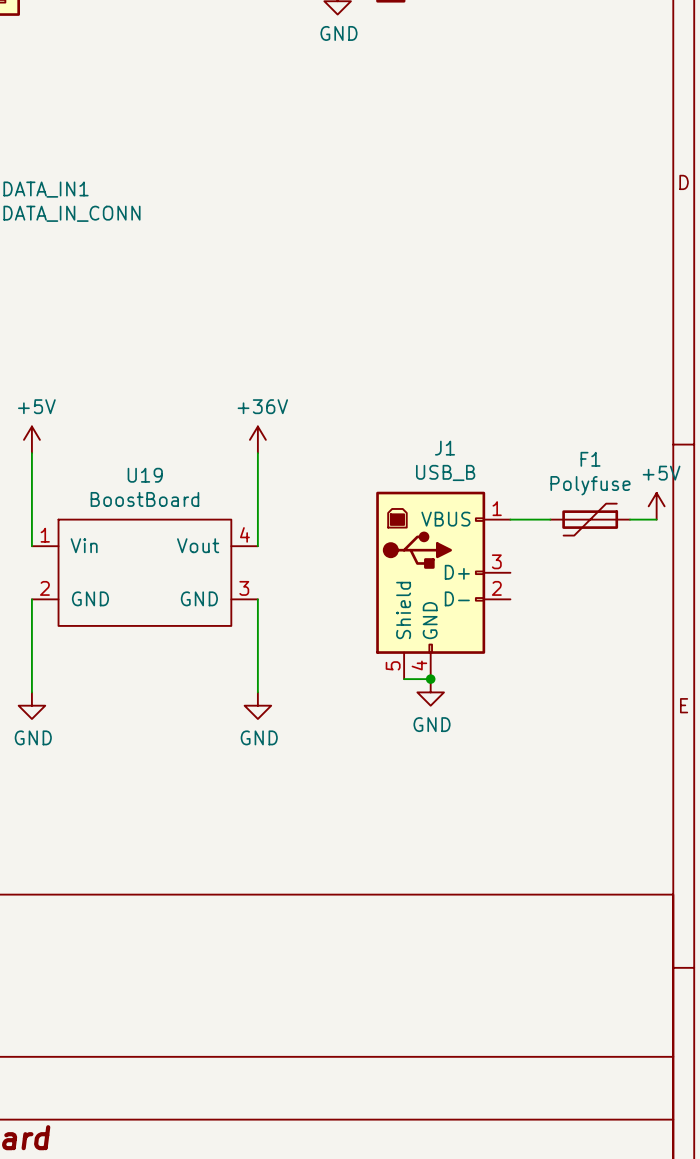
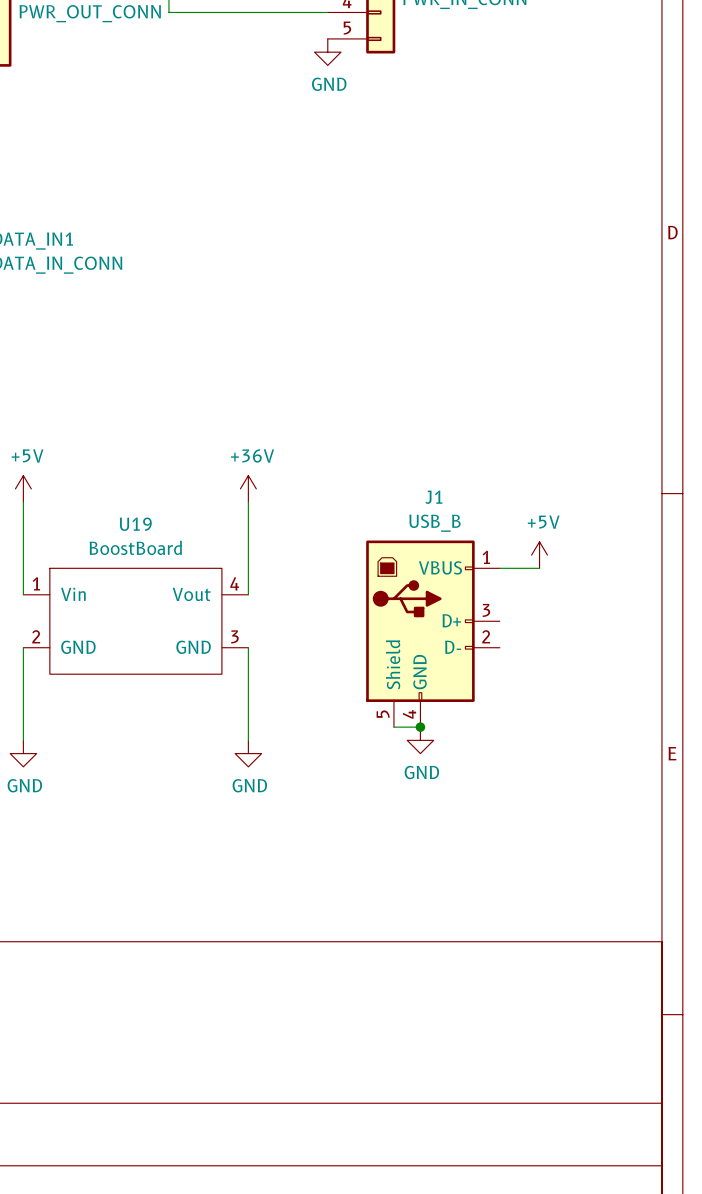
power symbol position: +5V (656, 506) -> +5V (539, 555)
F1: Polyfuse (590, 519) -> none
wire: (630, 519) (656, 519) -> none

